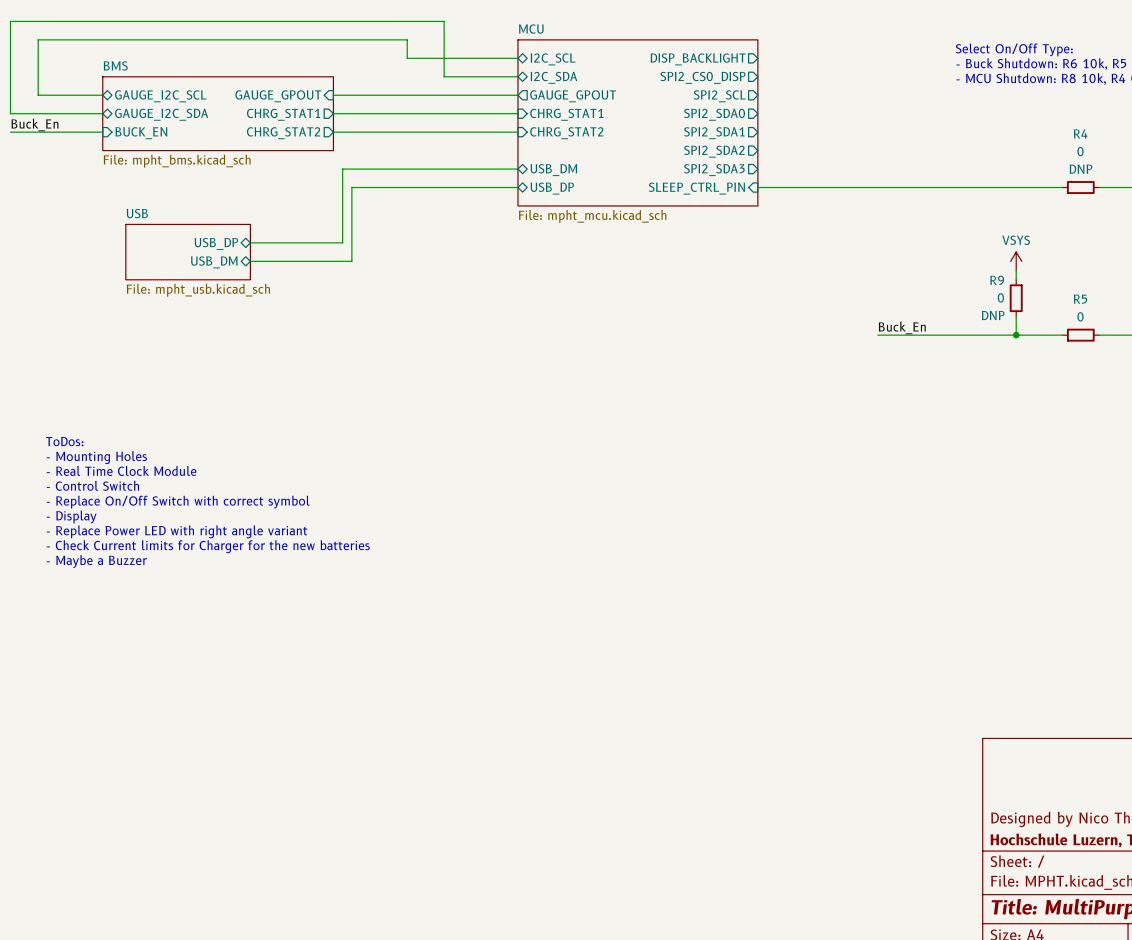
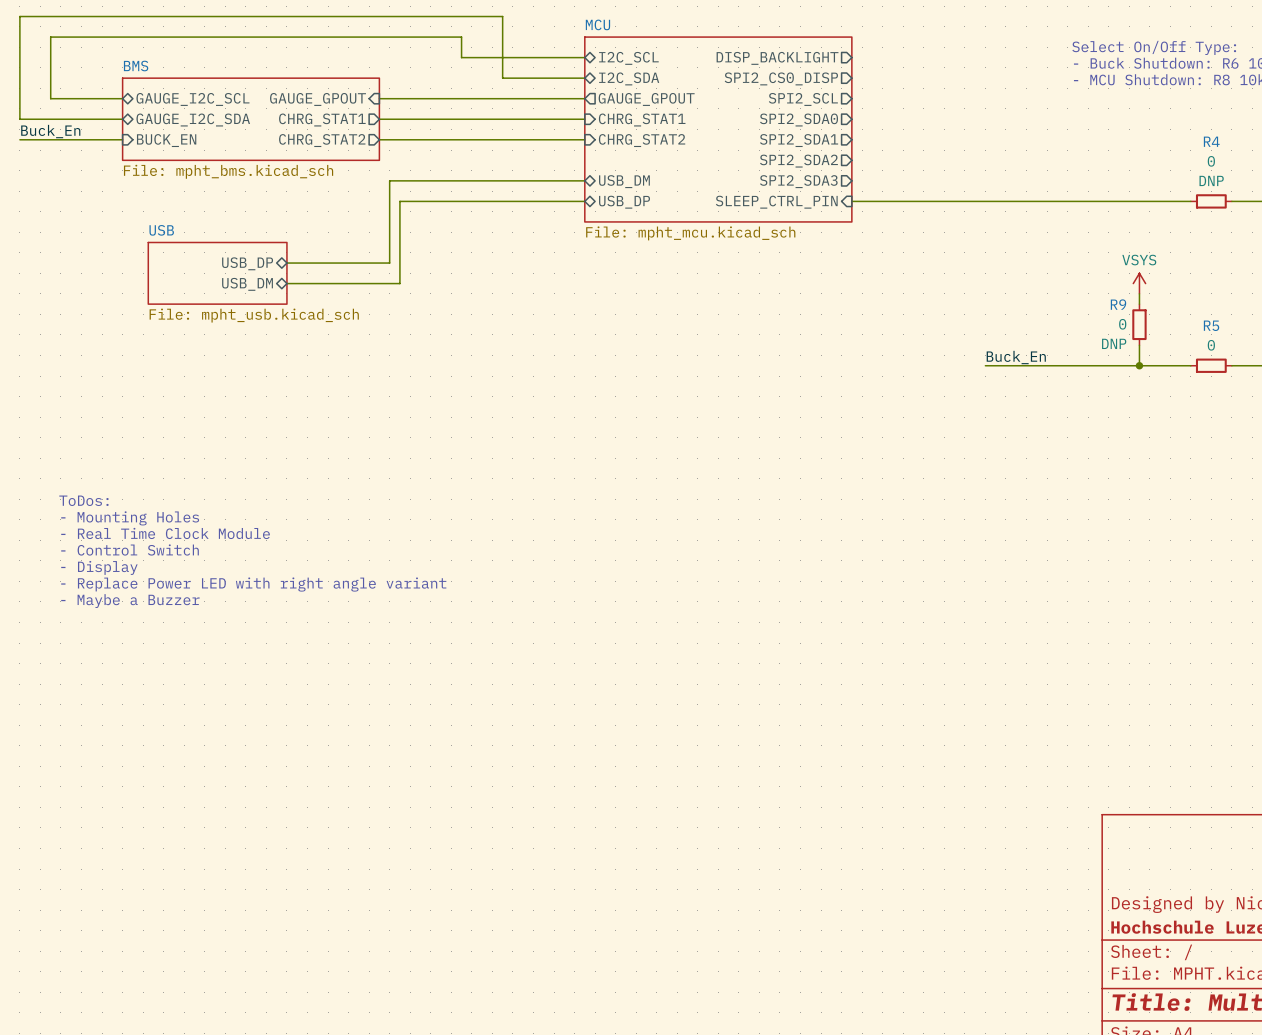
text: ToDos: (64, 441) -> none
text: - Mounting Holes (96, 457) -> ToDos: (83, 500)
text: - Real Time Clock Module (121, 470) -> - Mounting Holes (130, 518)
text: - Control Switch (92, 485) -> - Real Time Clock Module (165, 533)
text: - Replace On/Off Switch with correct symbol (178, 502) -> - Control Switch (130, 550)
text: - Check Current limits for Charger for the new batteries (208, 546) -> - Maybe a Buzzer (130, 601)
text: - Maybe a Buzzer (96, 561) -> none

